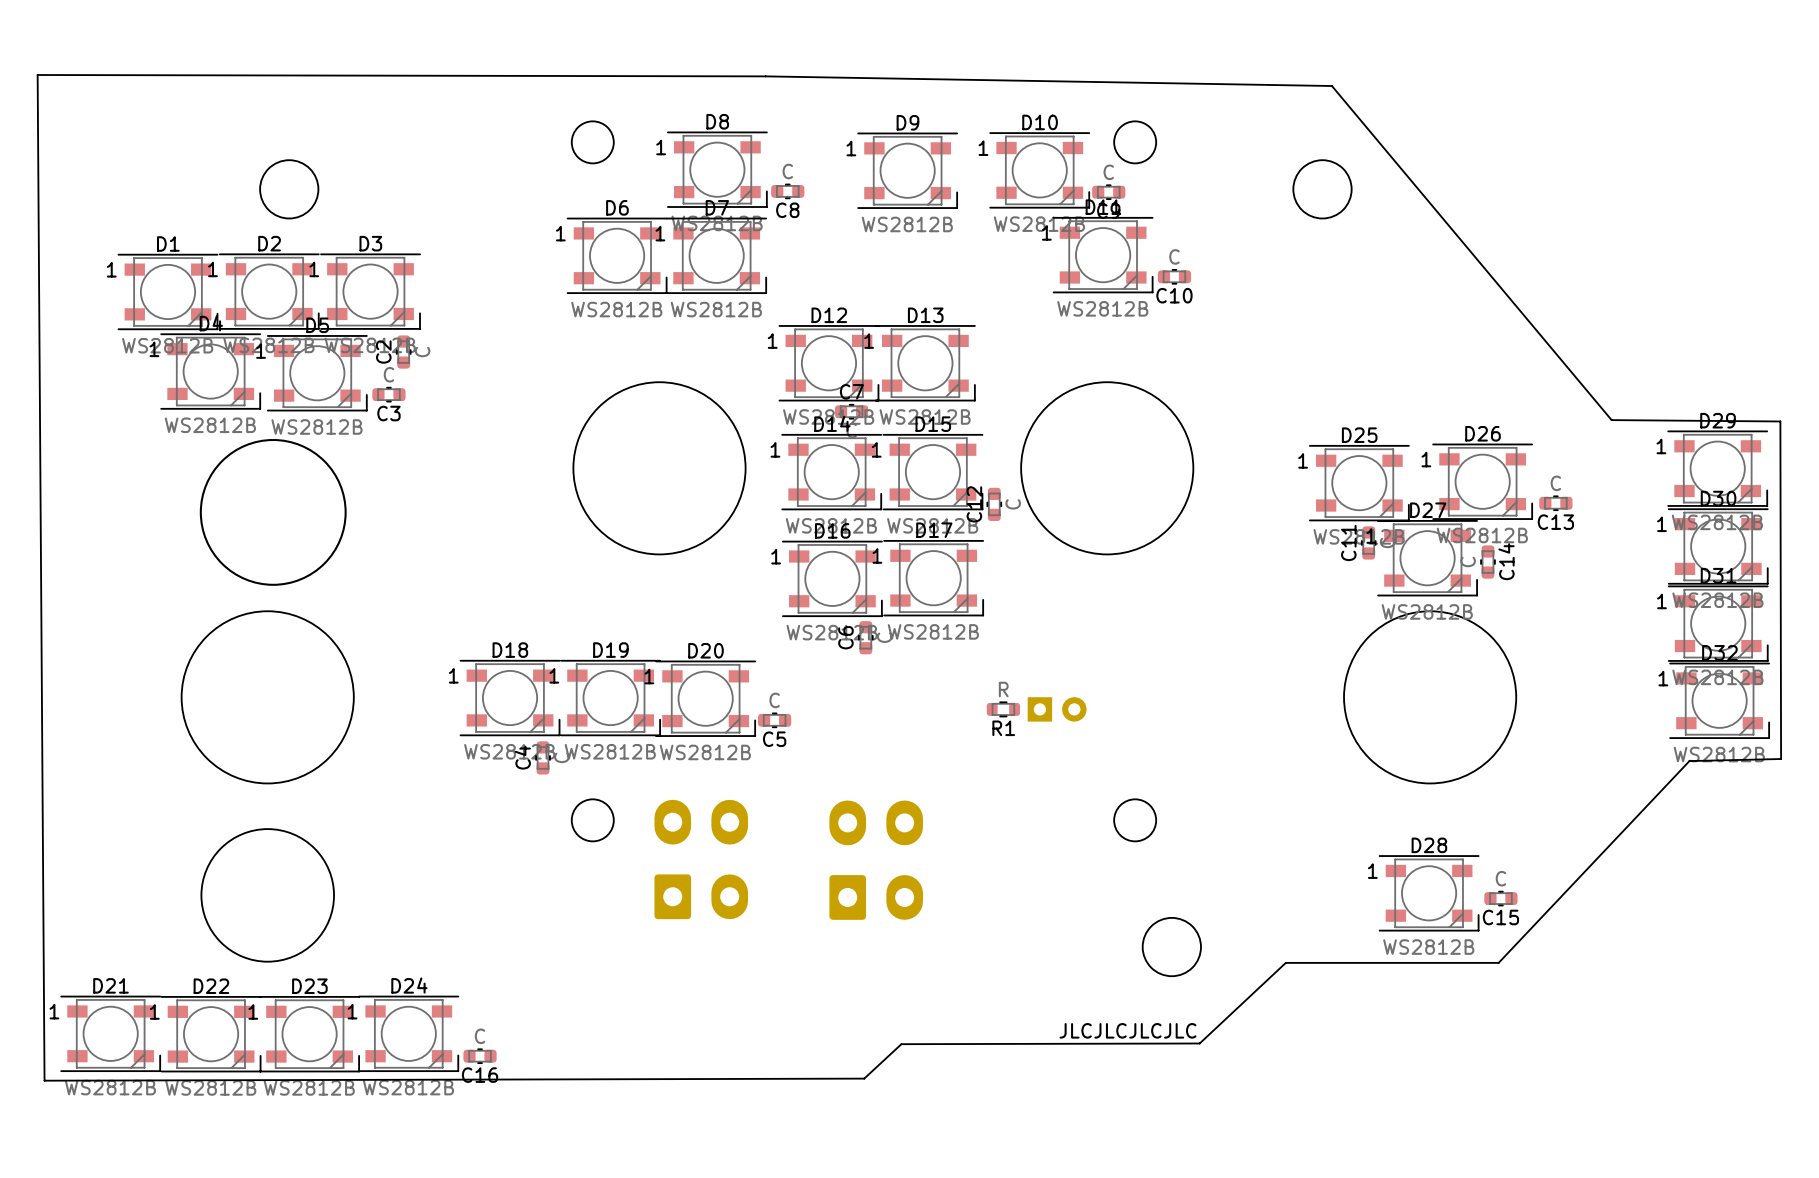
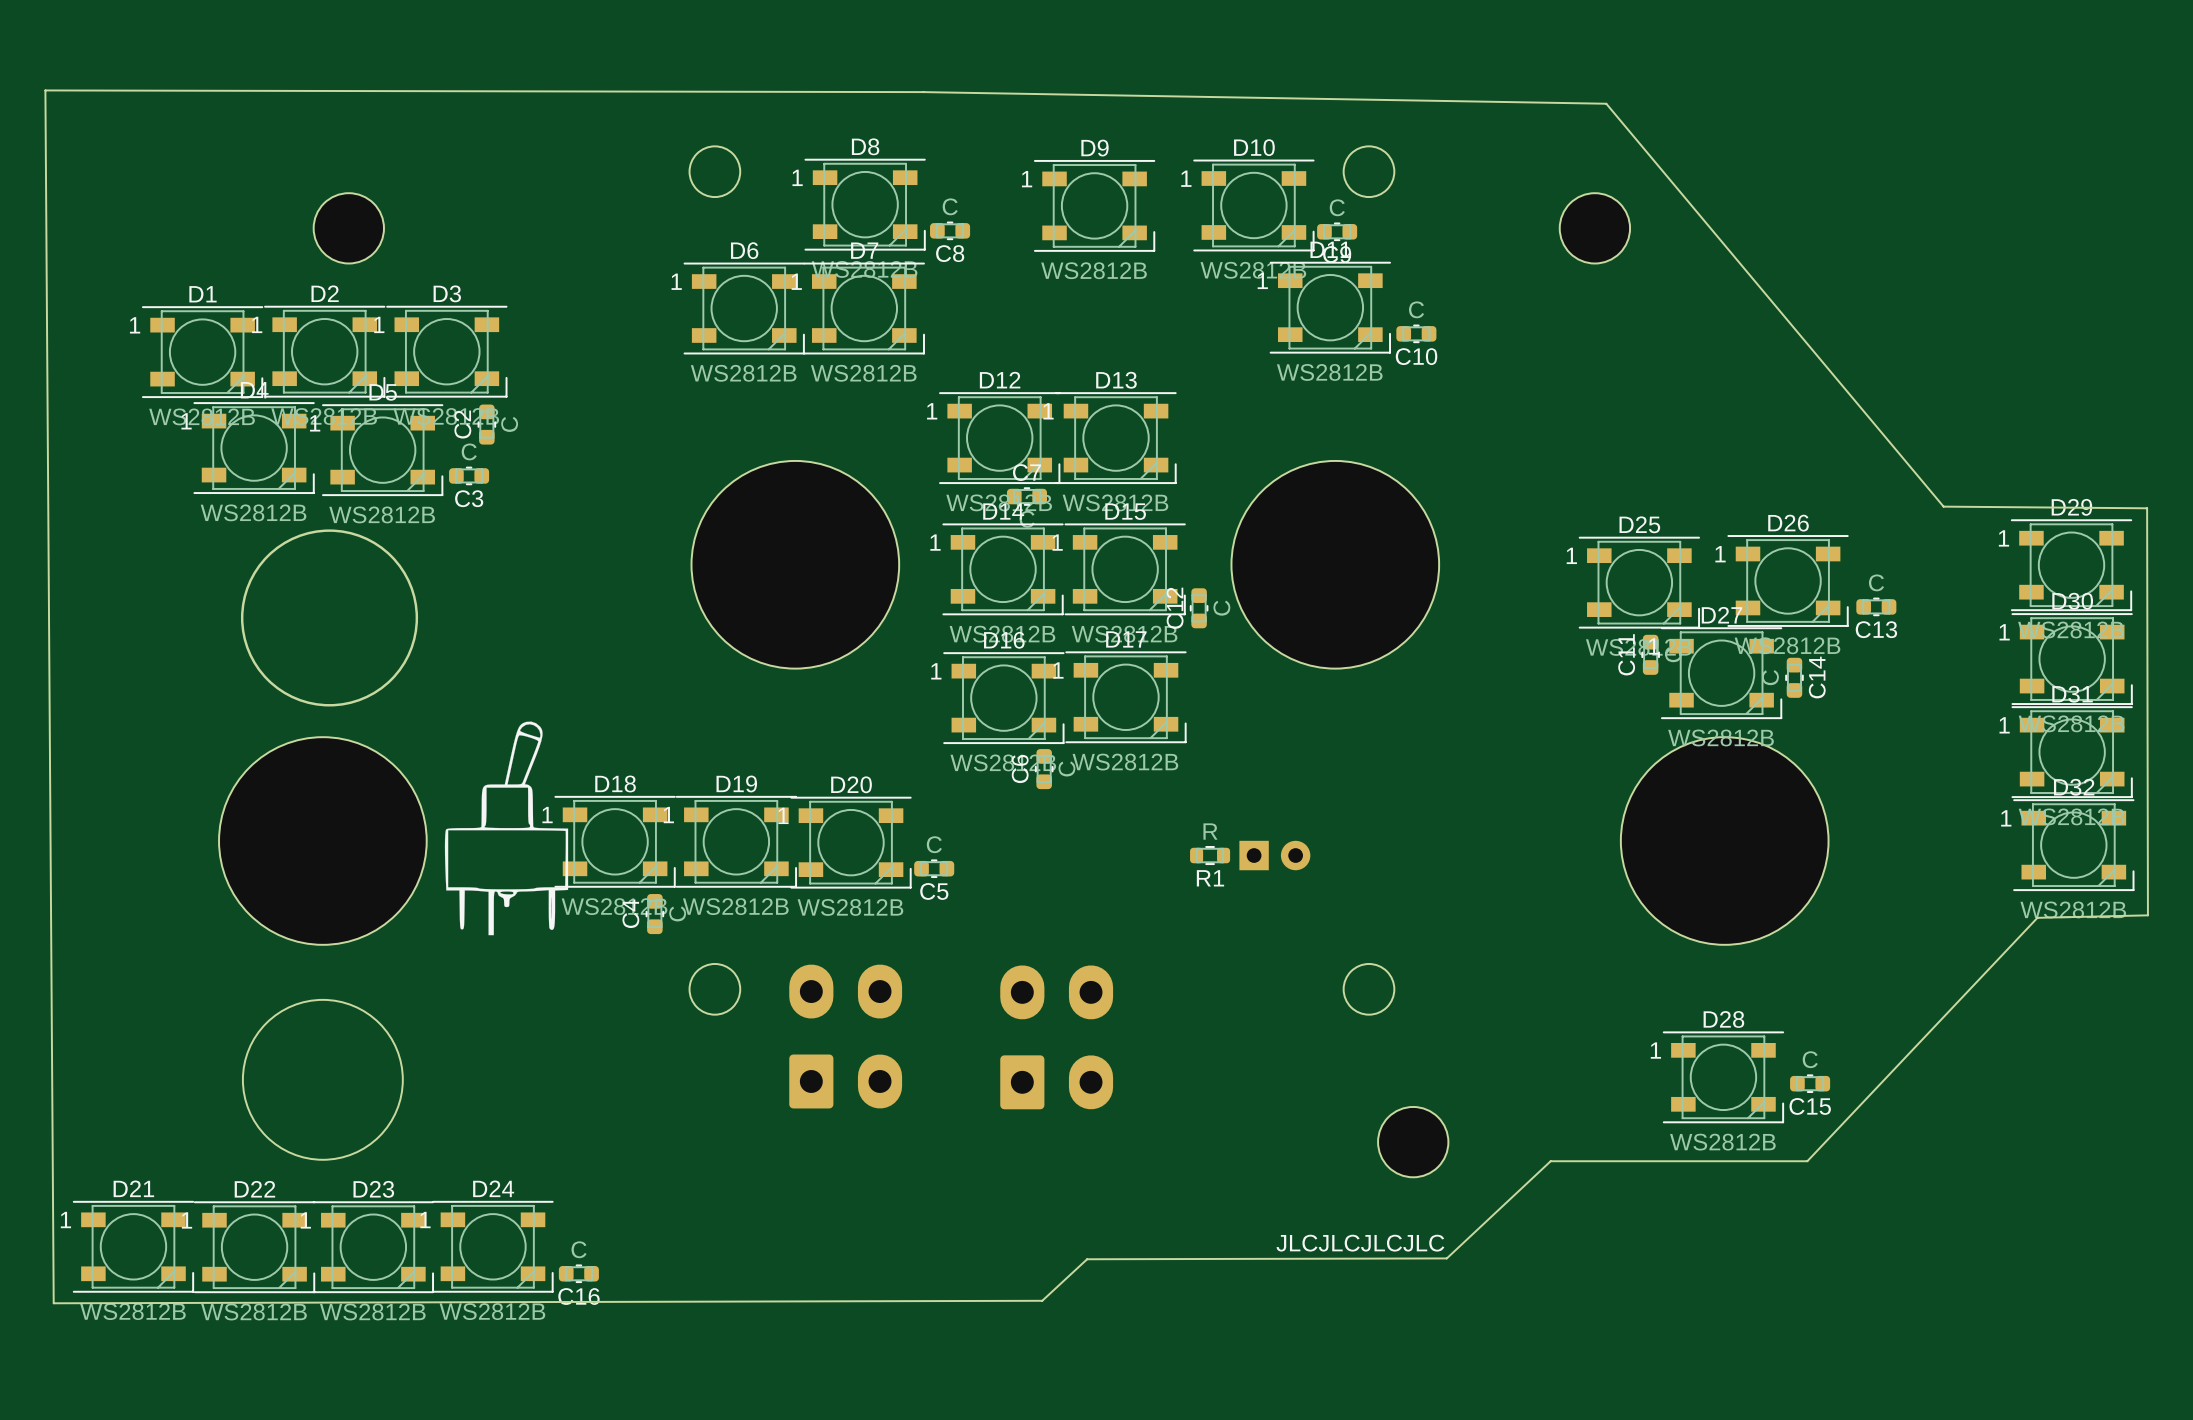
drawing: none -> [444, 721, 569, 936]

